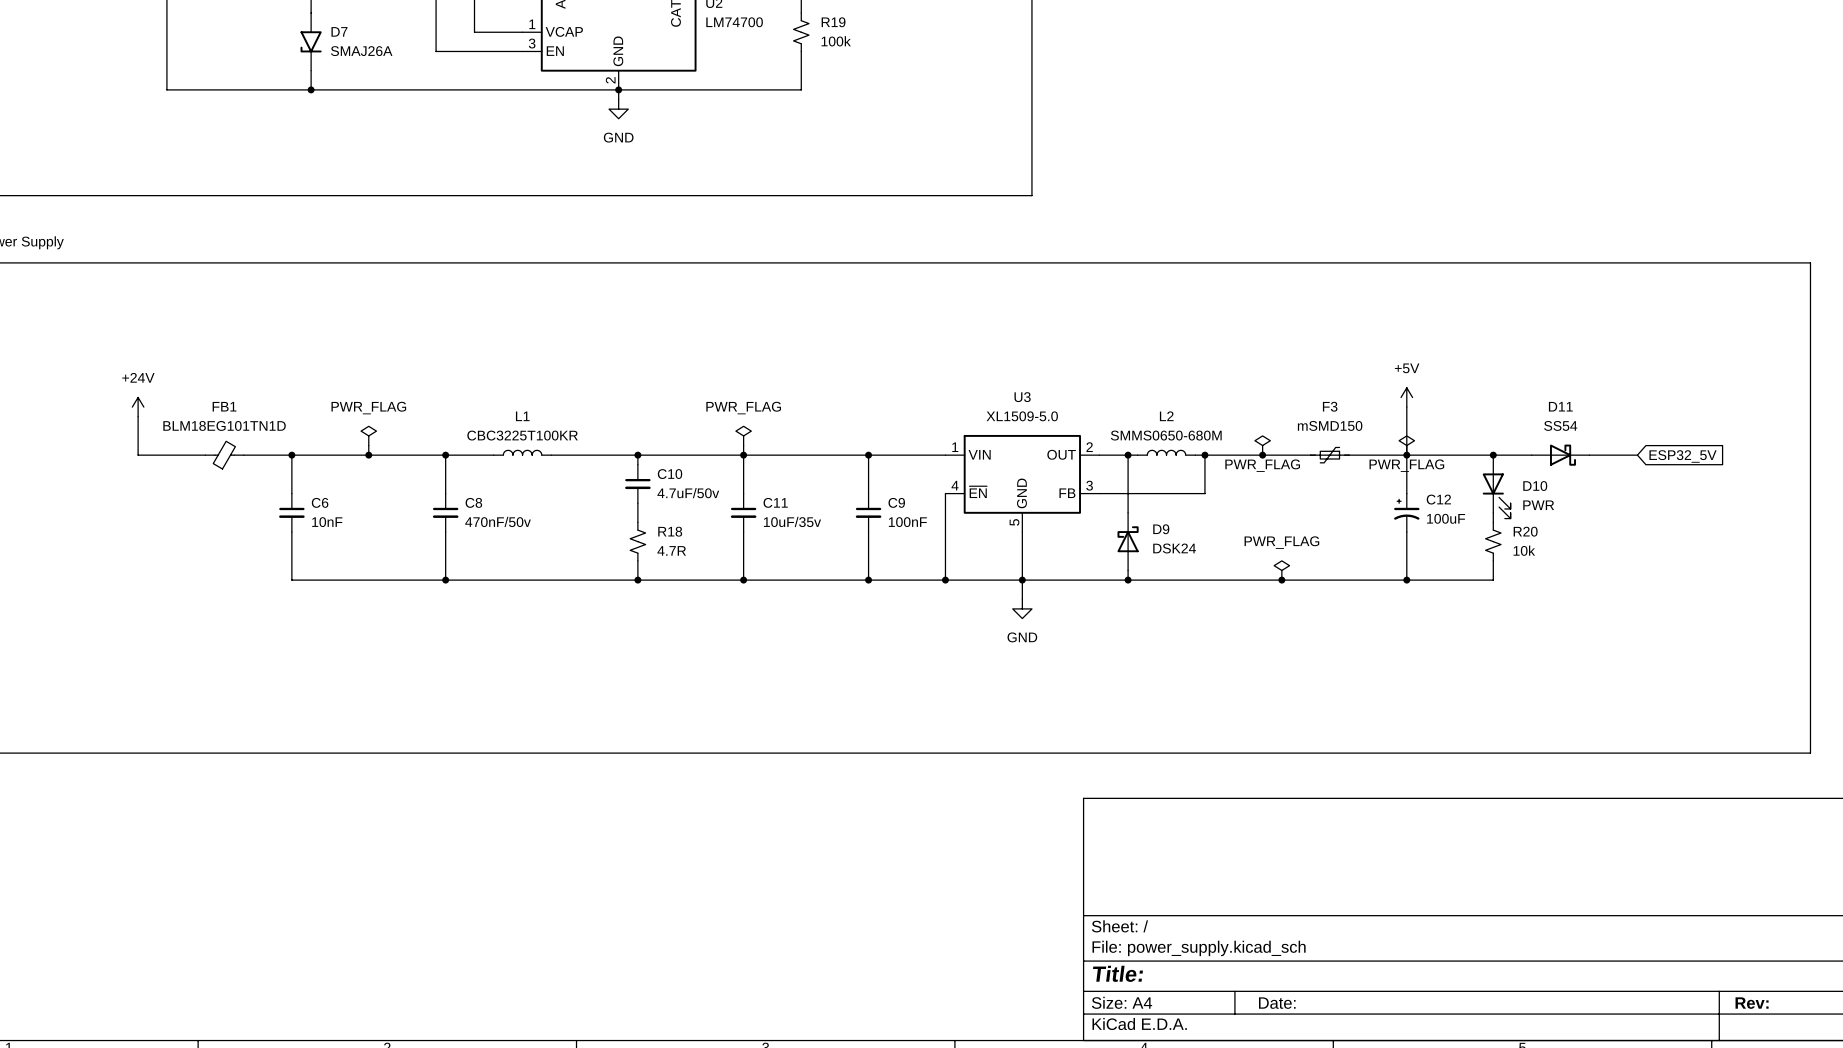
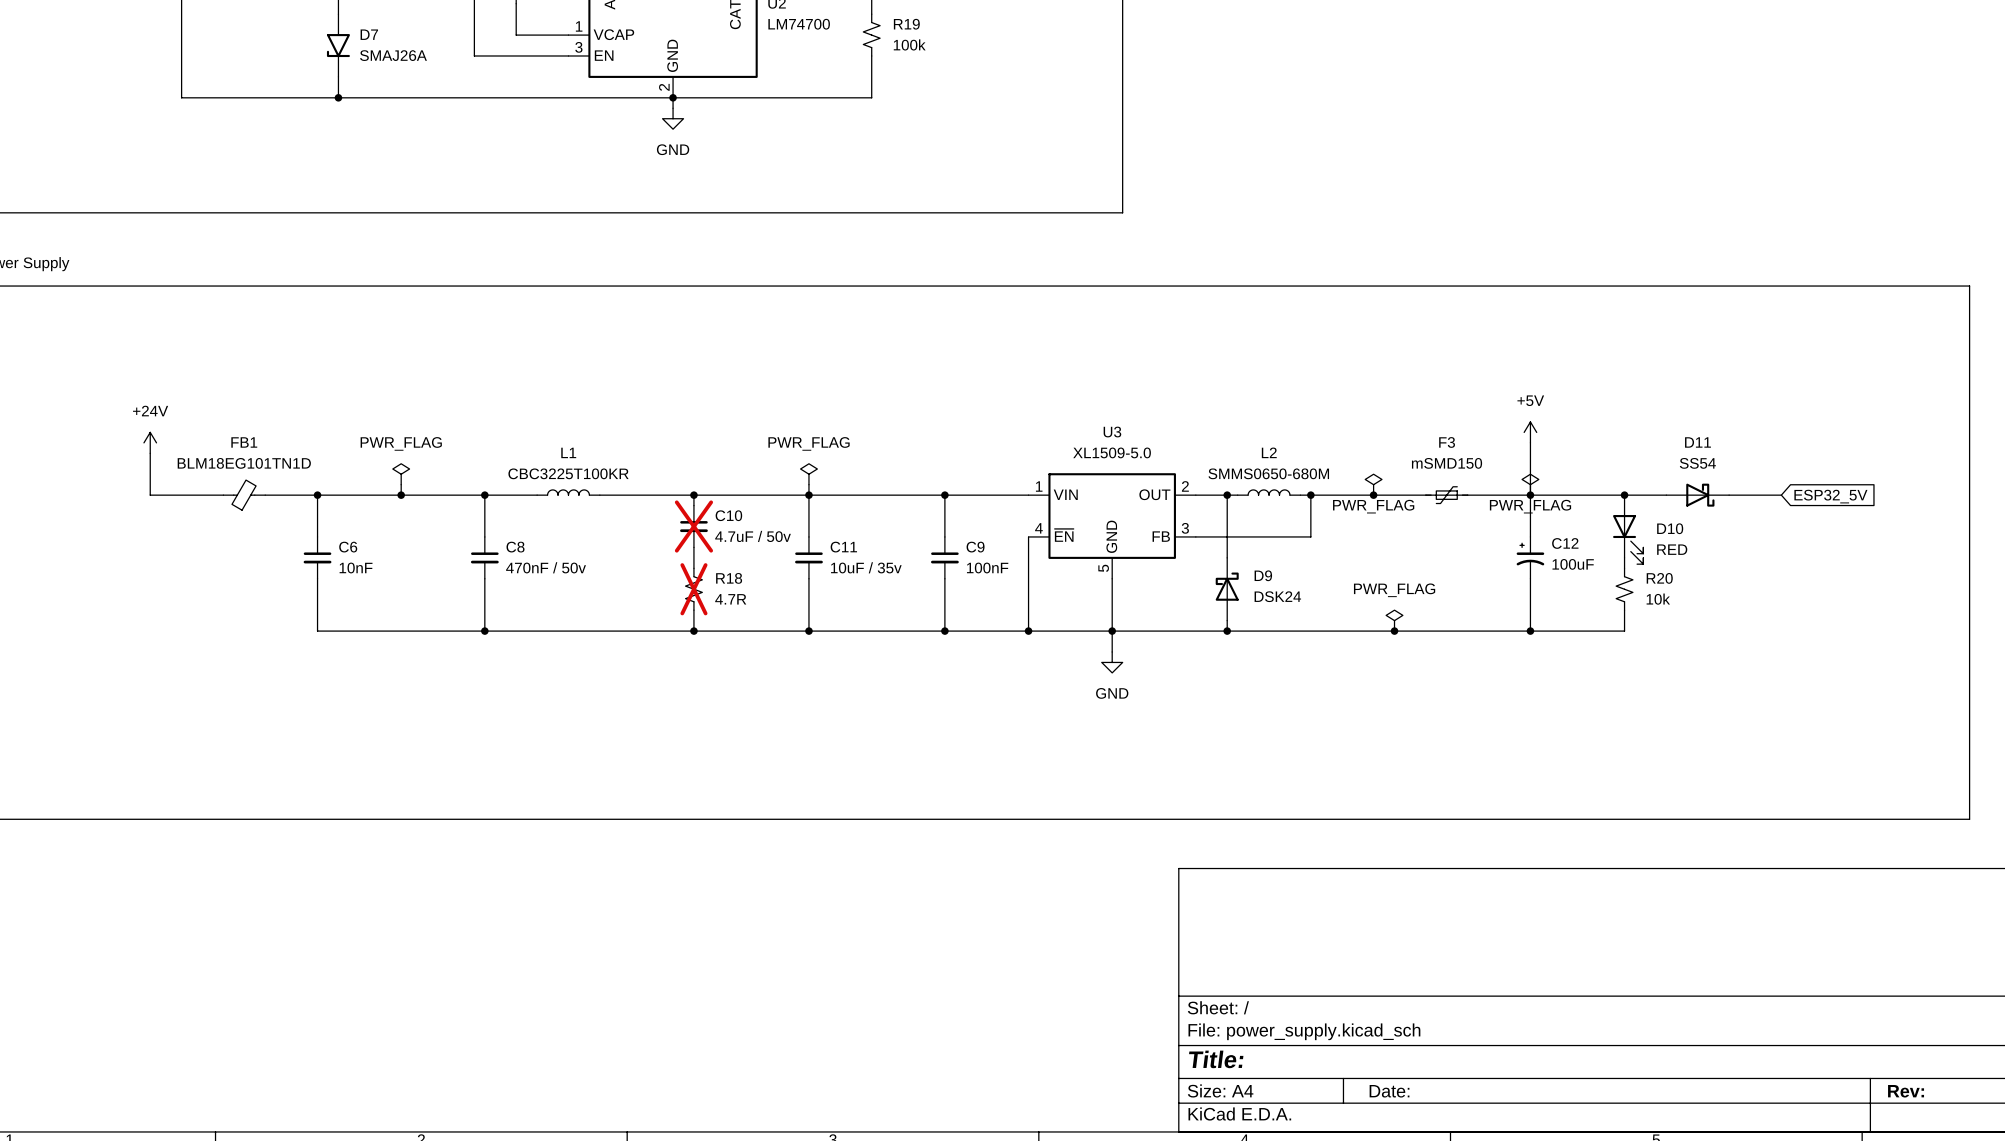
C10 do-not-place cross: none -> (693, 526)
C10 value: 4.7uF/50v (688, 493) -> 4.7uF / 50v (753, 536)
D10 value: PWR (1538, 505) -> RED (1672, 549)
C8 value: 470nF/50v (498, 521) -> 470nF / 50v (546, 567)
C11 value: 10uF/35v (792, 521) -> 10uF / 35v (866, 567)
R18 do-not-place cross: none -> (693, 589)

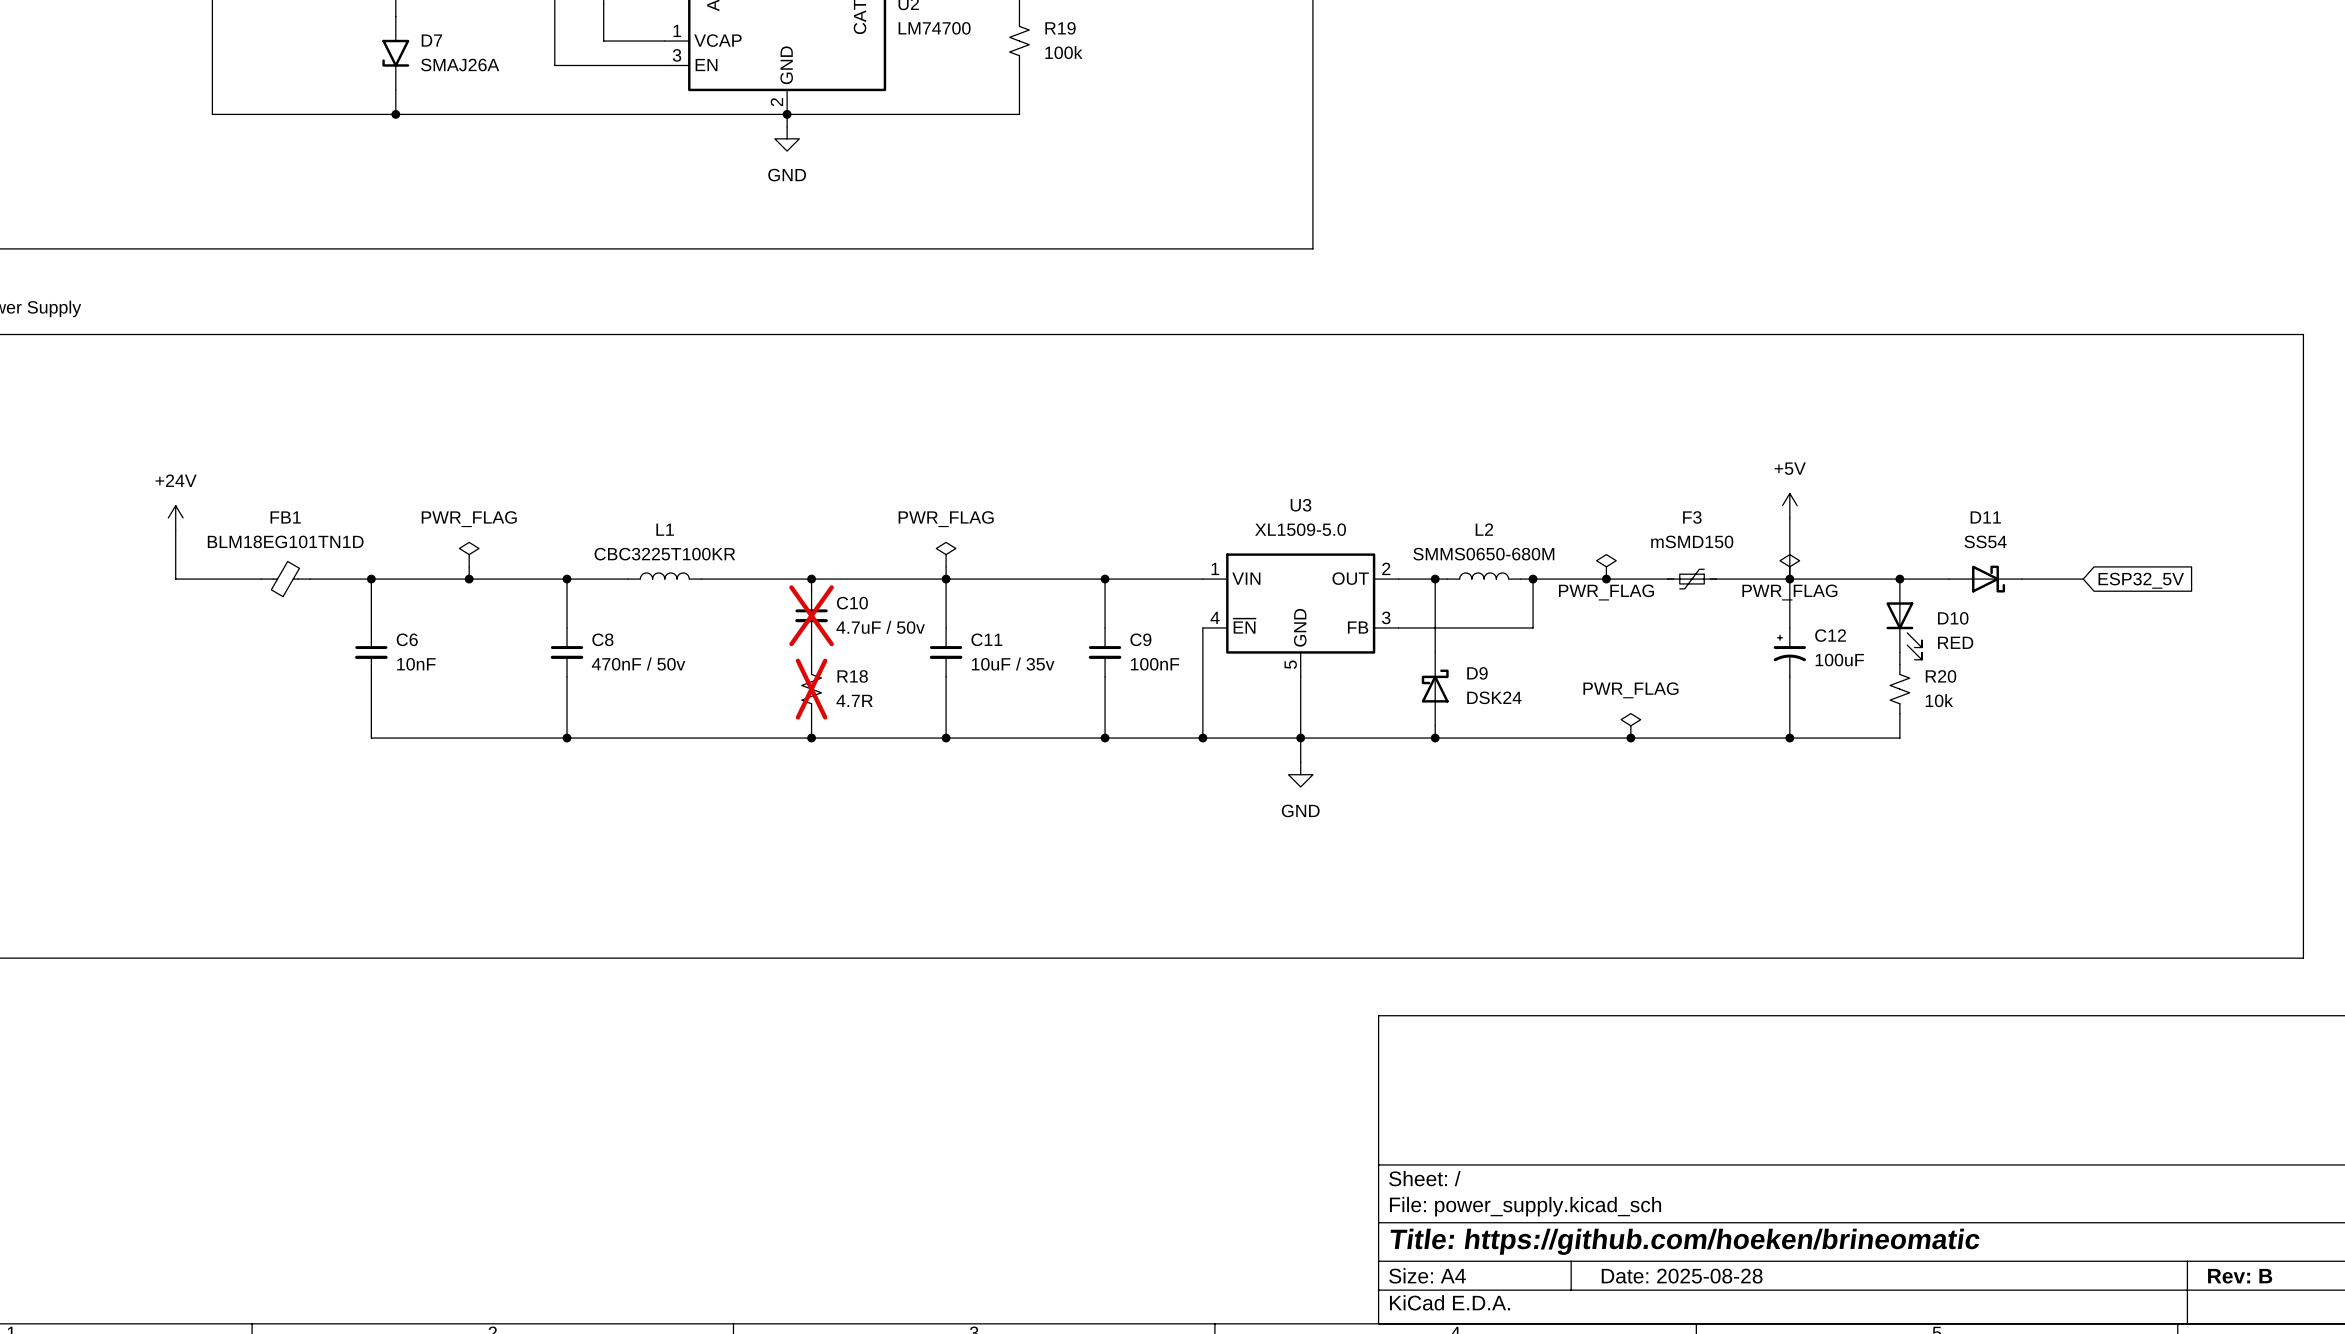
title block: Title: (1216, 1059) -> Title: https://github.com/hoeken/brineomatic (1685, 1241)
title block: Date: (1389, 1091) -> Date: 2025-08-28 (1682, 1276)
title block: Rev: (1906, 1091) -> Rev: B (2240, 1276)

